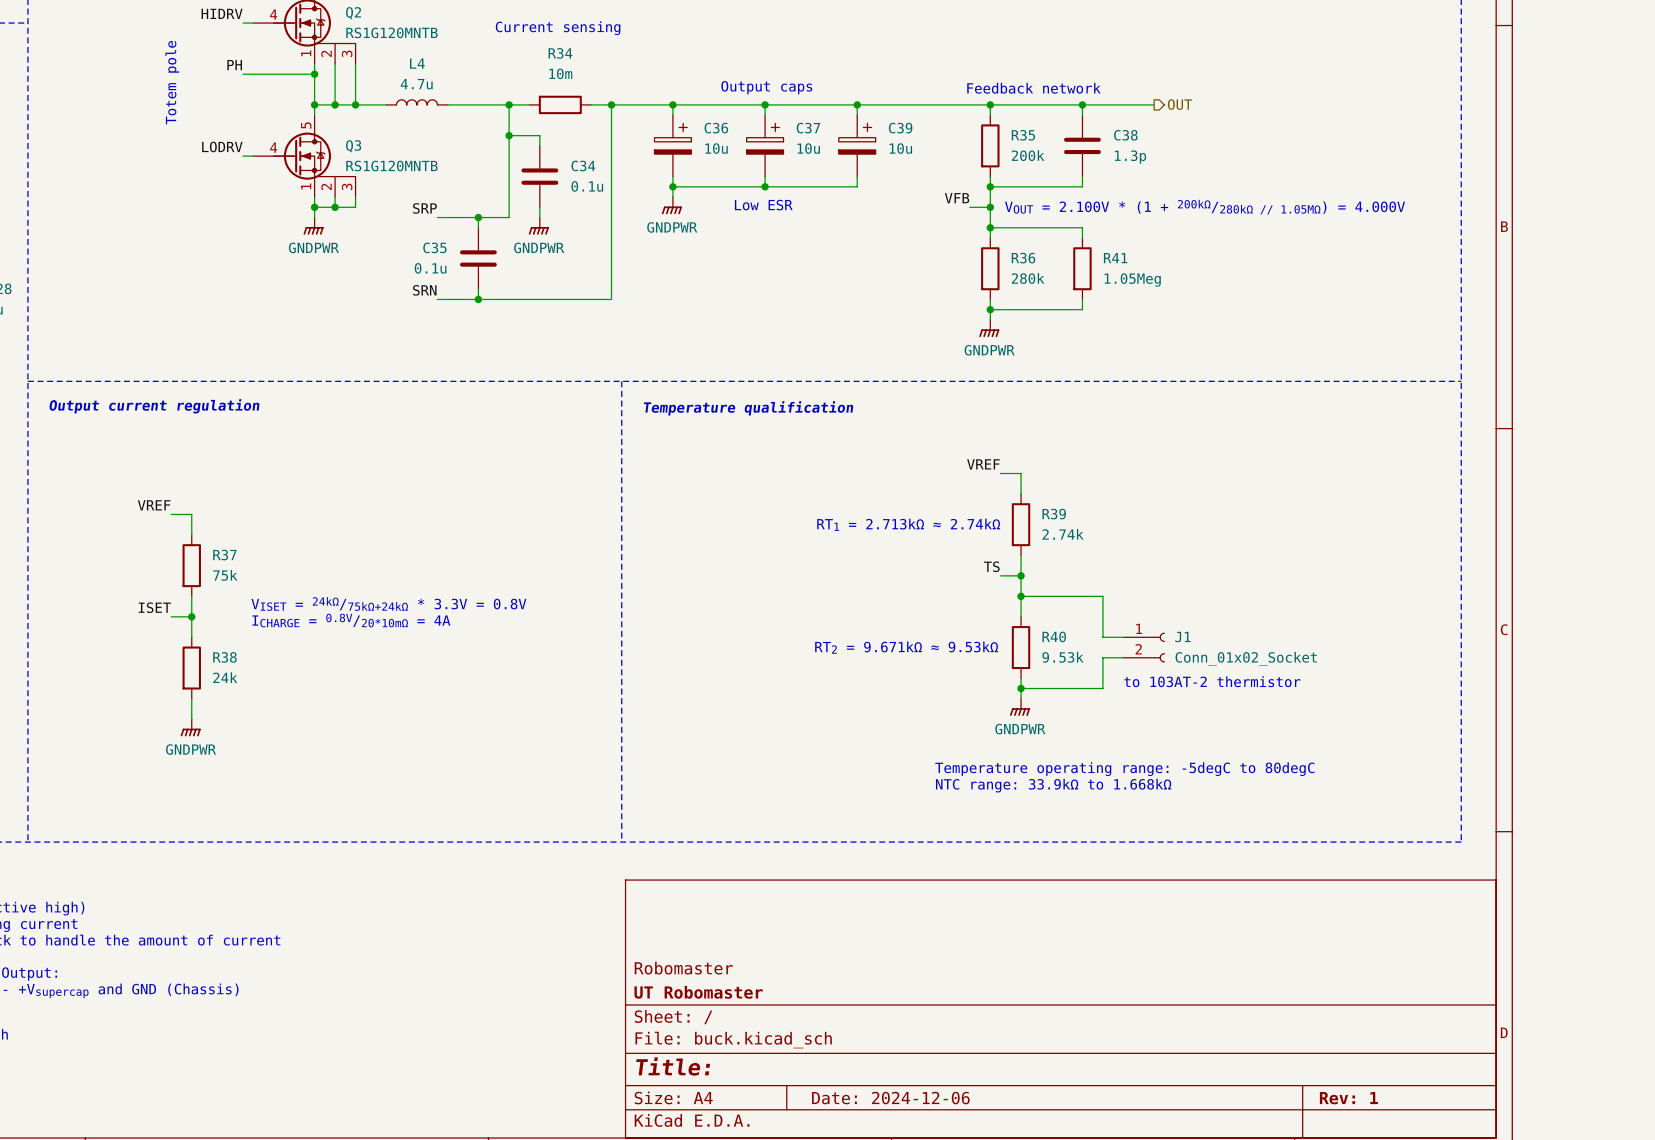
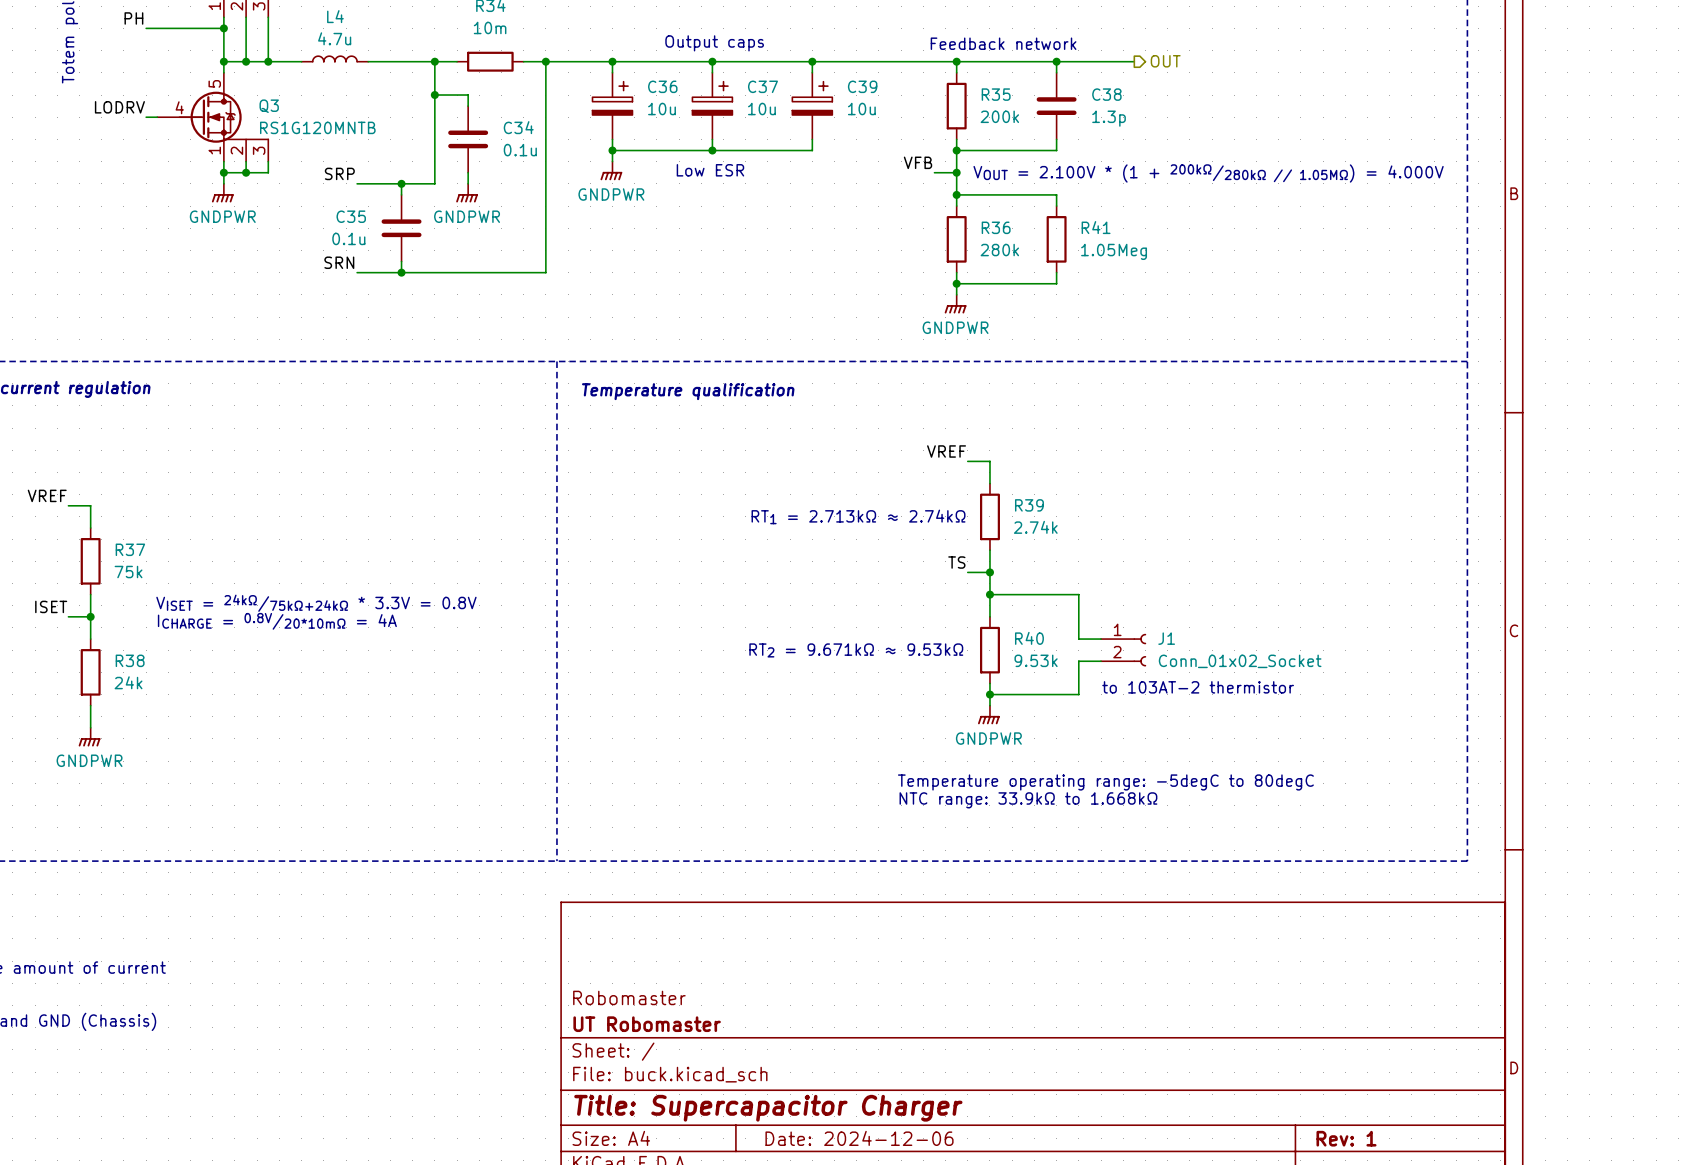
title block: Title: (673, 1066) -> Title: Supercapacitor Charger (768, 1108)

